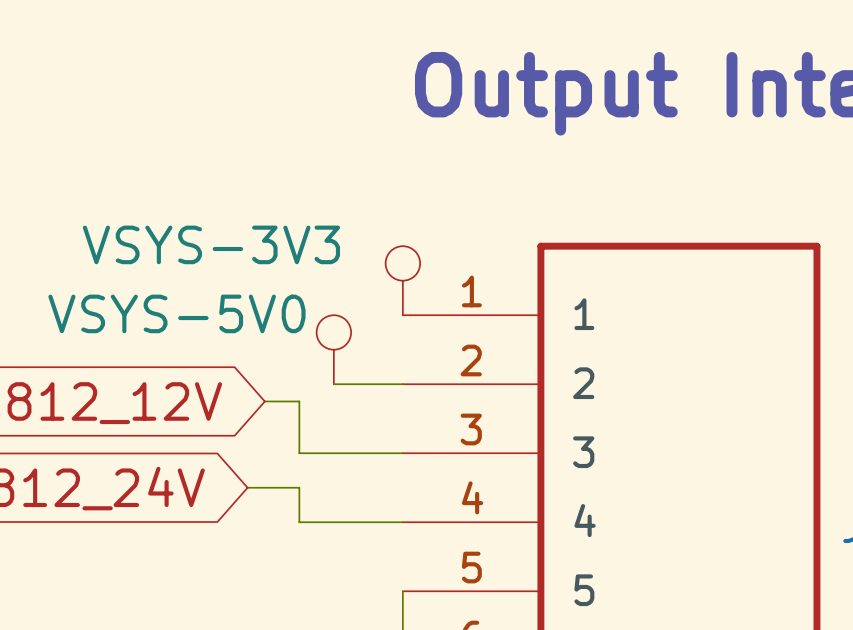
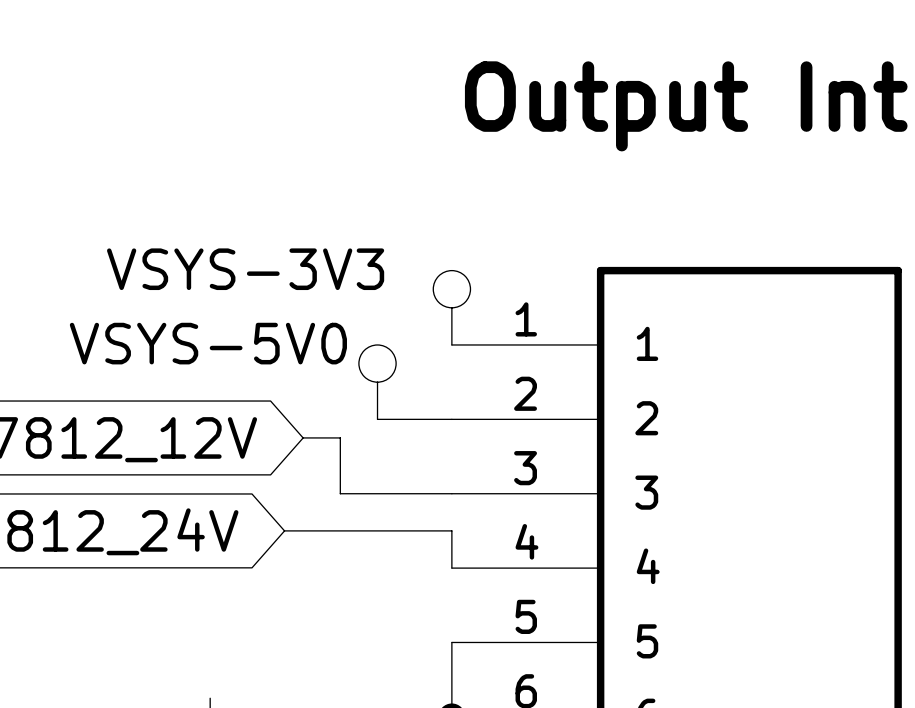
wire: (299, 487) (299, 522) (402, 522) -> (340, 530) (451, 530) (451, 568)

